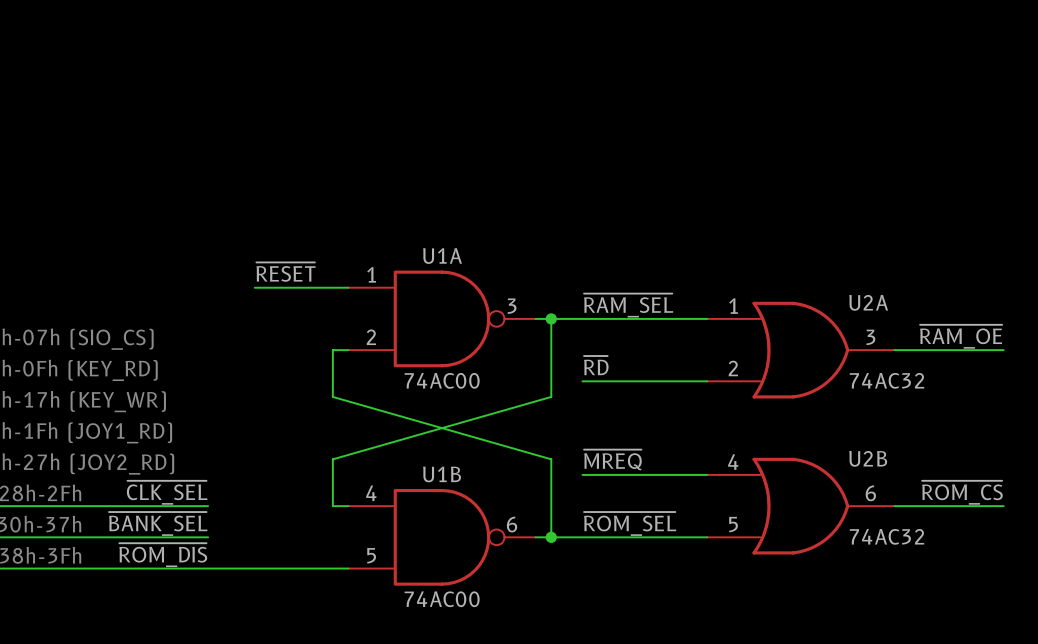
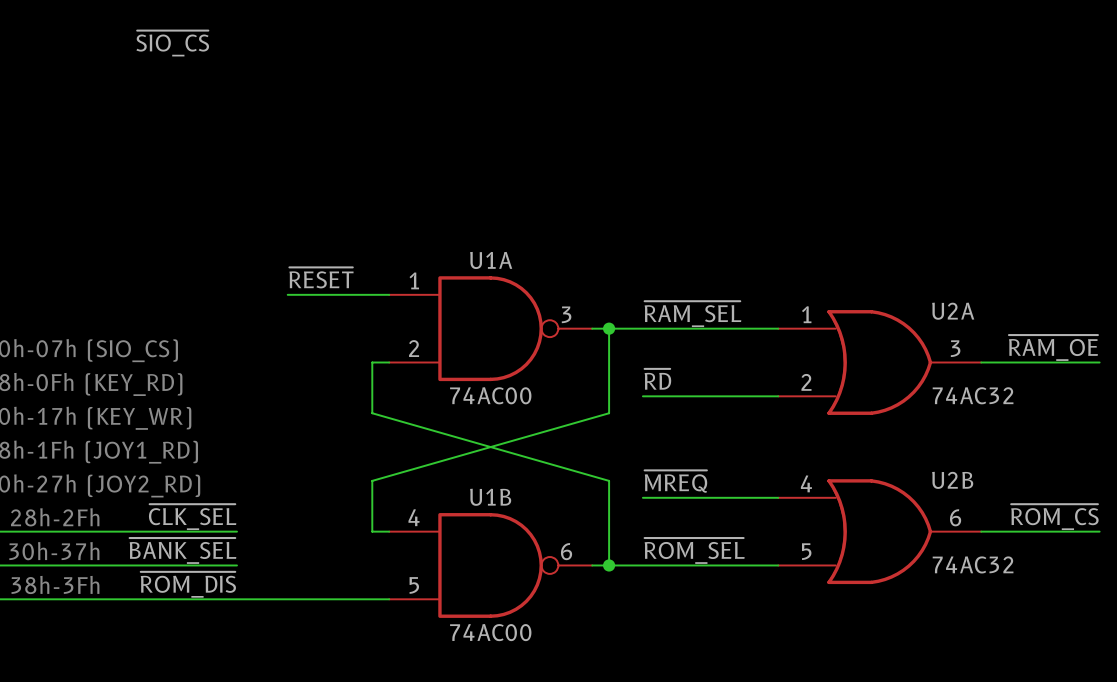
label: none -> ~{SIO_CS} (172, 43)

